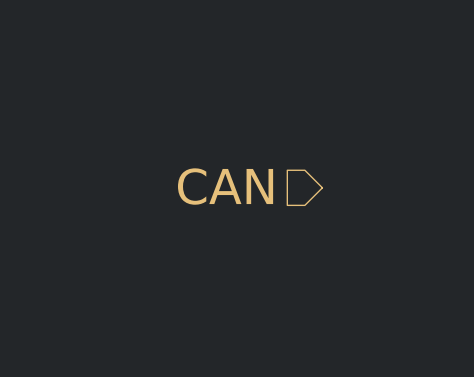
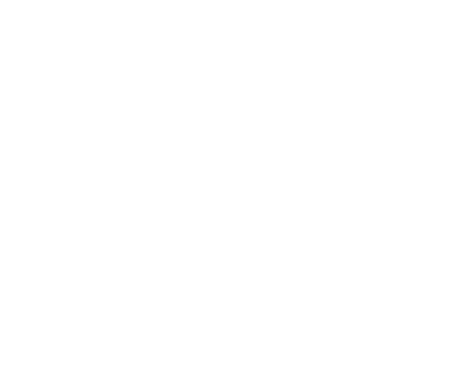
hierarchical label: CAN (225, 186) -> none

